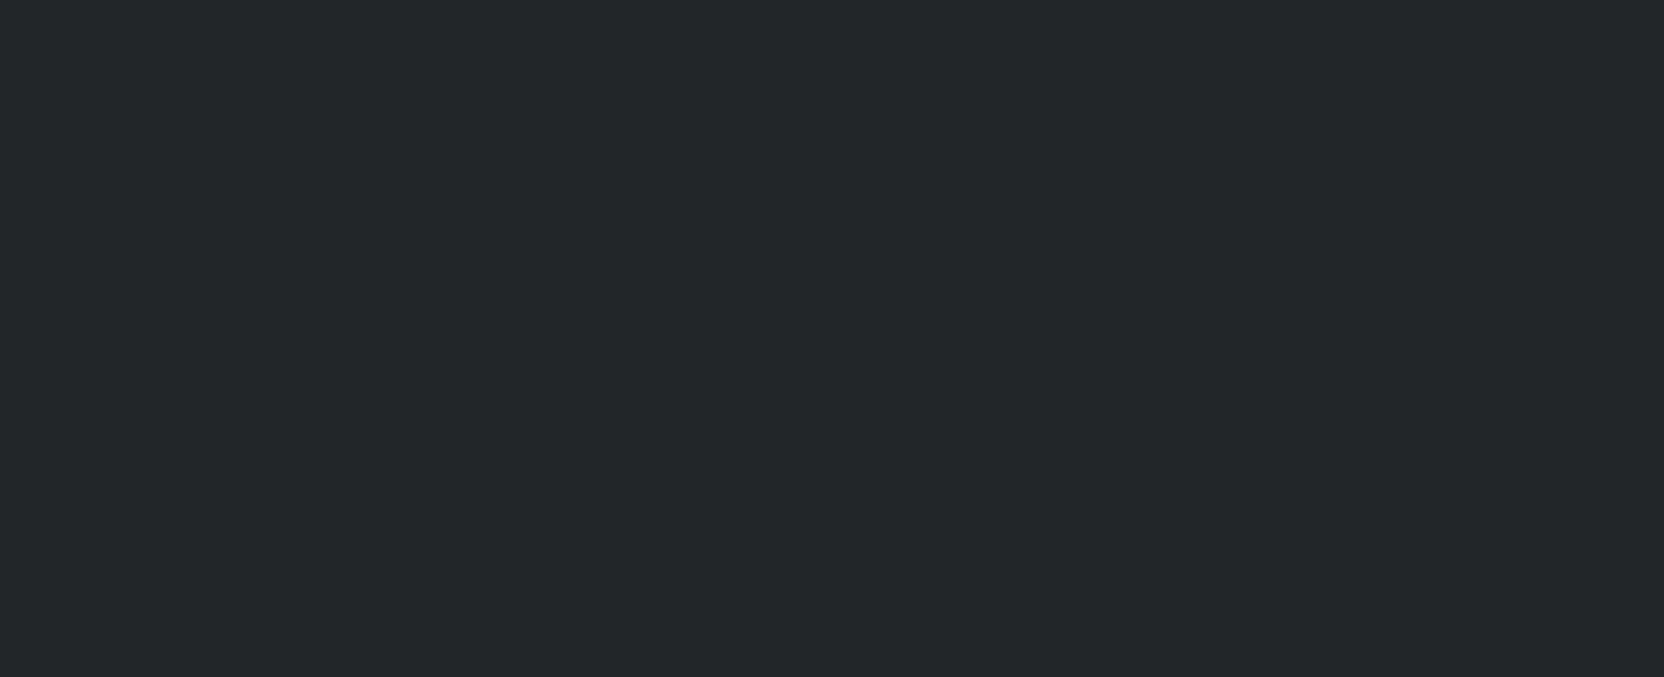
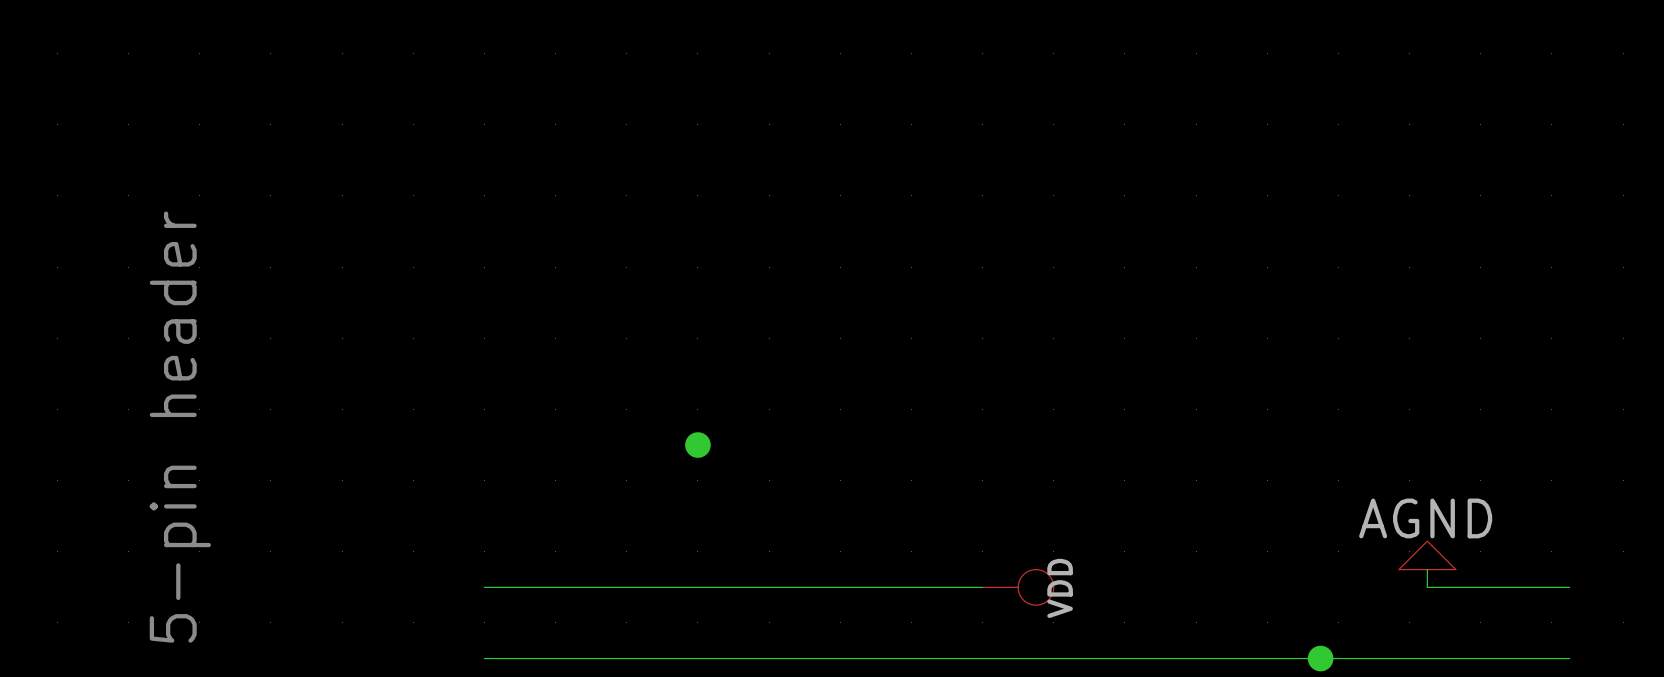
text: none -> 5-pin header (180, 427)
junction: none -> (697, 445)
power symbol: none -> AGND (1427, 555)
wire: none -> (1427, 569) (1427, 587) (1569, 587)
wire: none -> (484, 587) (982, 587)
power symbol: none -> VDD (1018, 587)
wire: none -> (484, 658) (1569, 658)
junction: none -> (1320, 658)

